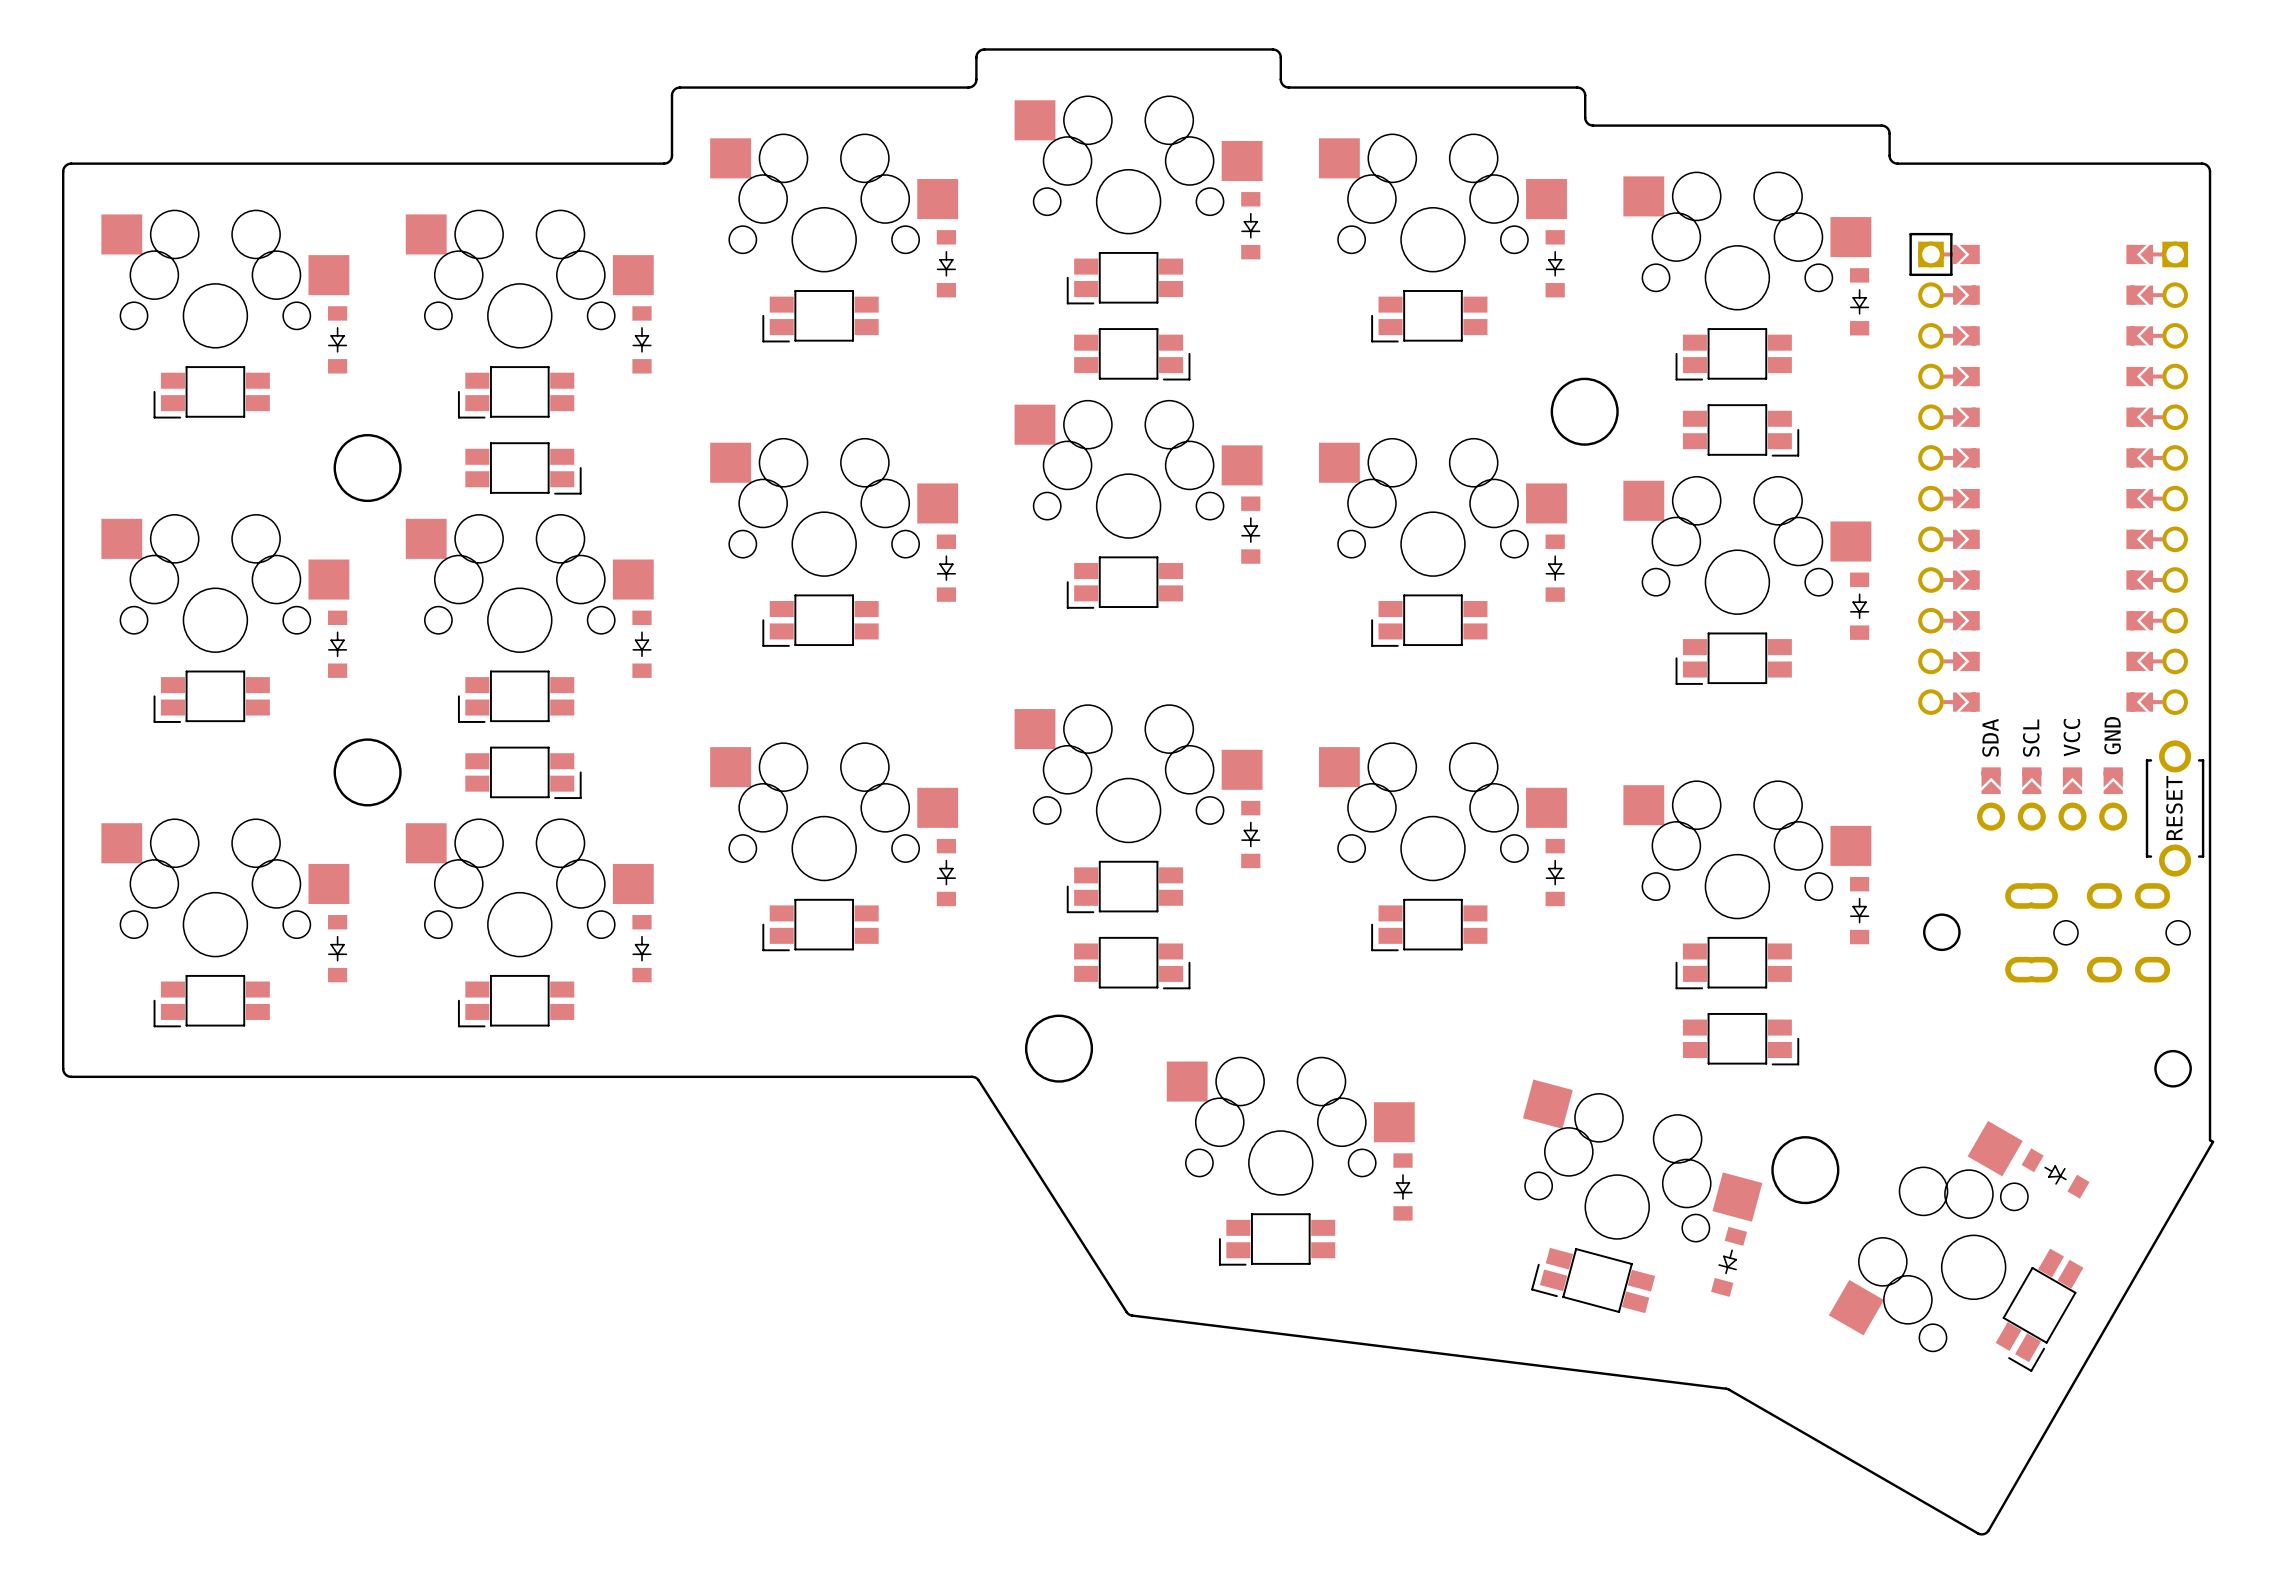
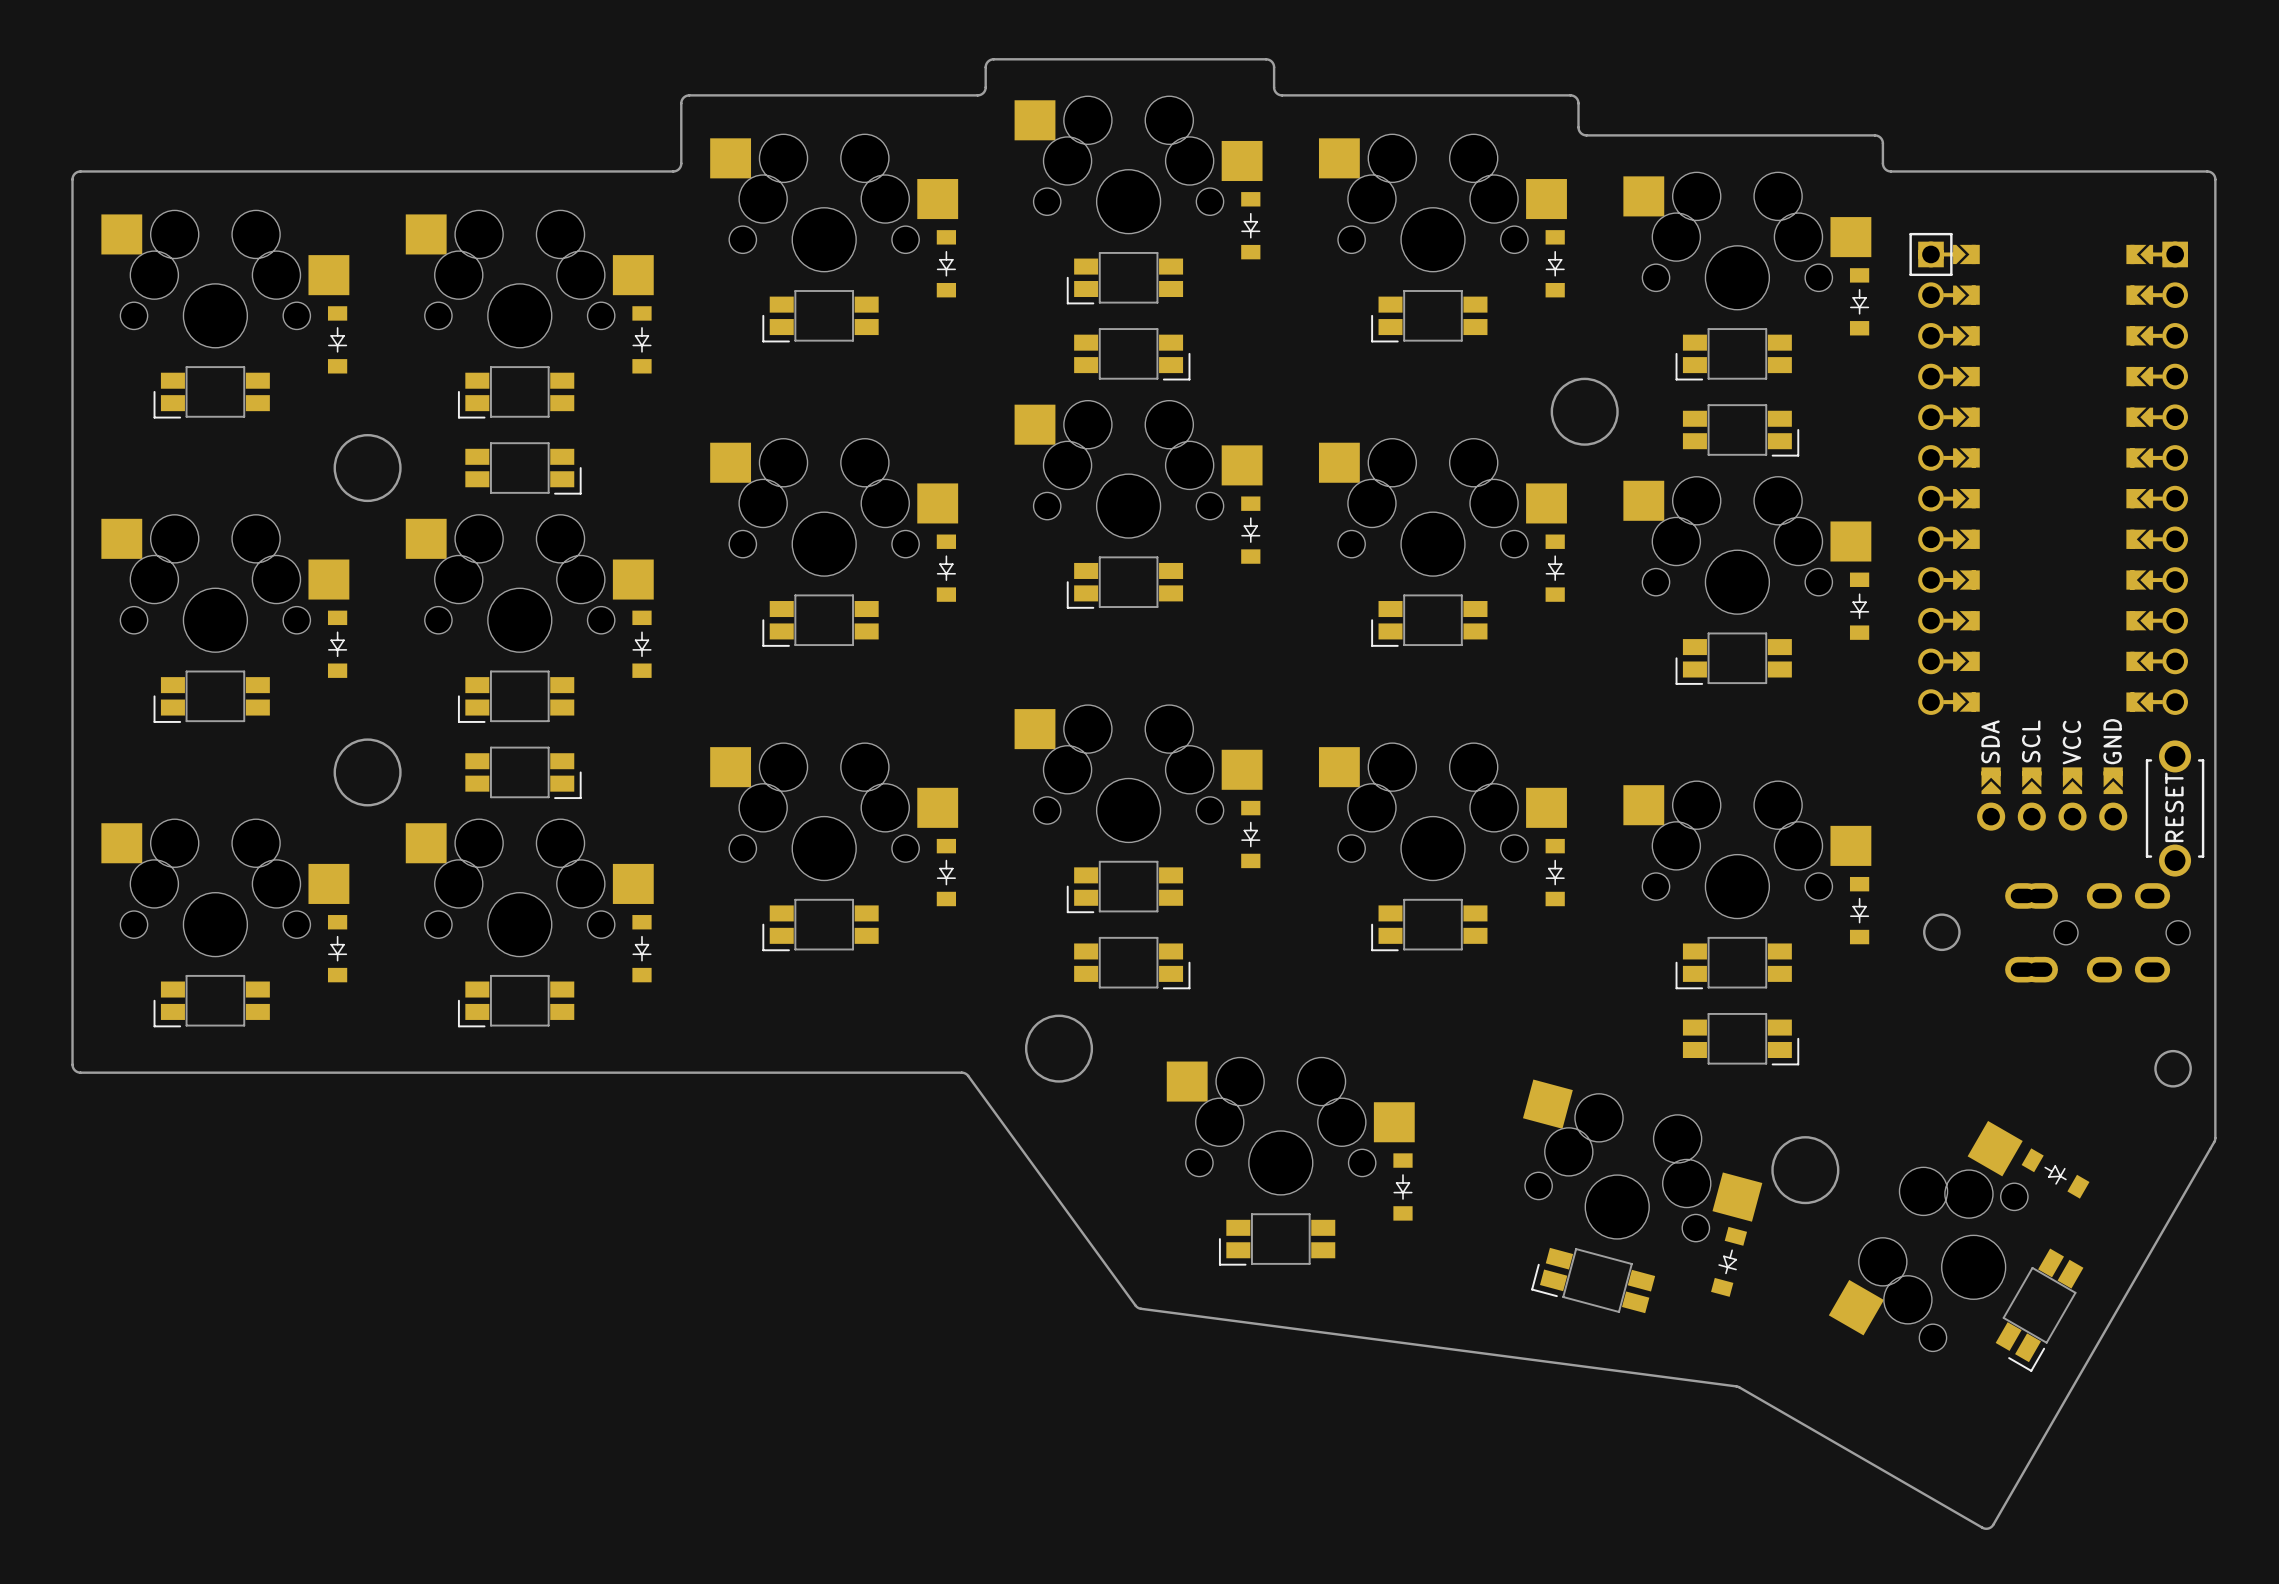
board edge: (984, 49) (1273, 49) (1280, 54) (1281, 81) (1287, 87) (1578, 87) (1584, 92) (1585, 119) (1592, 125) (1882, 125) (1888, 130) (1889, 157) (1896, 163) (2202, 163) (2208, 166) (2210, 171) (2210, 1140) (2213, 1141) (1986, 1532) (1977, 1533) (1726, 1388) (1129, 1314) (978, 1080) (974, 1077) (71, 1076) (64, 1073) (63, 1068) (63, 171) (65, 165) (71, 163) (665, 163) (669, 161) (671, 156) (672, 94) (676, 88) (969, 87) (976, 81) (977, 54) (984, 49) -> (993, 59) (986, 64) (985, 89) (978, 95) (686, 95) (681, 102) (681, 164) (678, 169) (674, 171) (80, 171) (74, 173) (72, 179) (72, 1064) (74, 1069) (80, 1072) (963, 1072) (968, 1075) (1138, 1308) (1737, 1386) (1982, 1527) (1990, 1527) (2215, 1139) (2215, 179) (2213, 174) (2207, 171) (1889, 171) (1883, 165) (1882, 140) (1875, 135) (1584, 135) (1578, 128) (1578, 101) (1571, 95) (1282, 95) (1274, 90) (1273, 65) (1267, 59) (993, 59)

